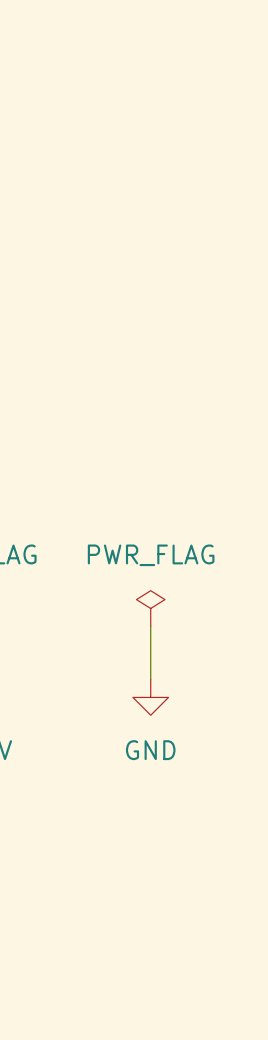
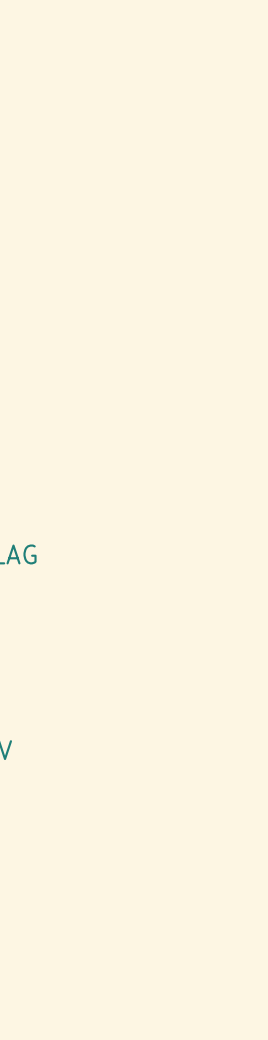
power symbol: PWR_FLAG (150, 608) -> none
wire: (150, 626) (150, 679) -> none
power symbol: GND (150, 697) -> none

